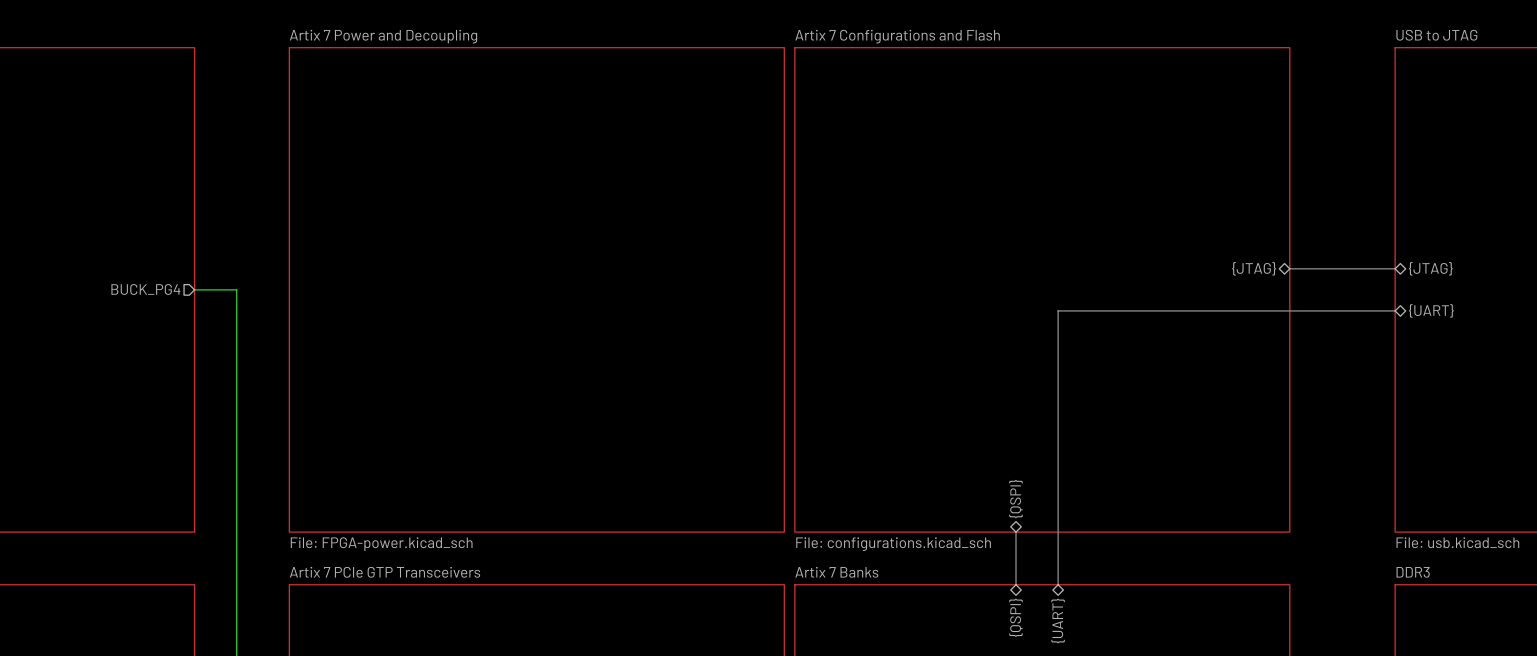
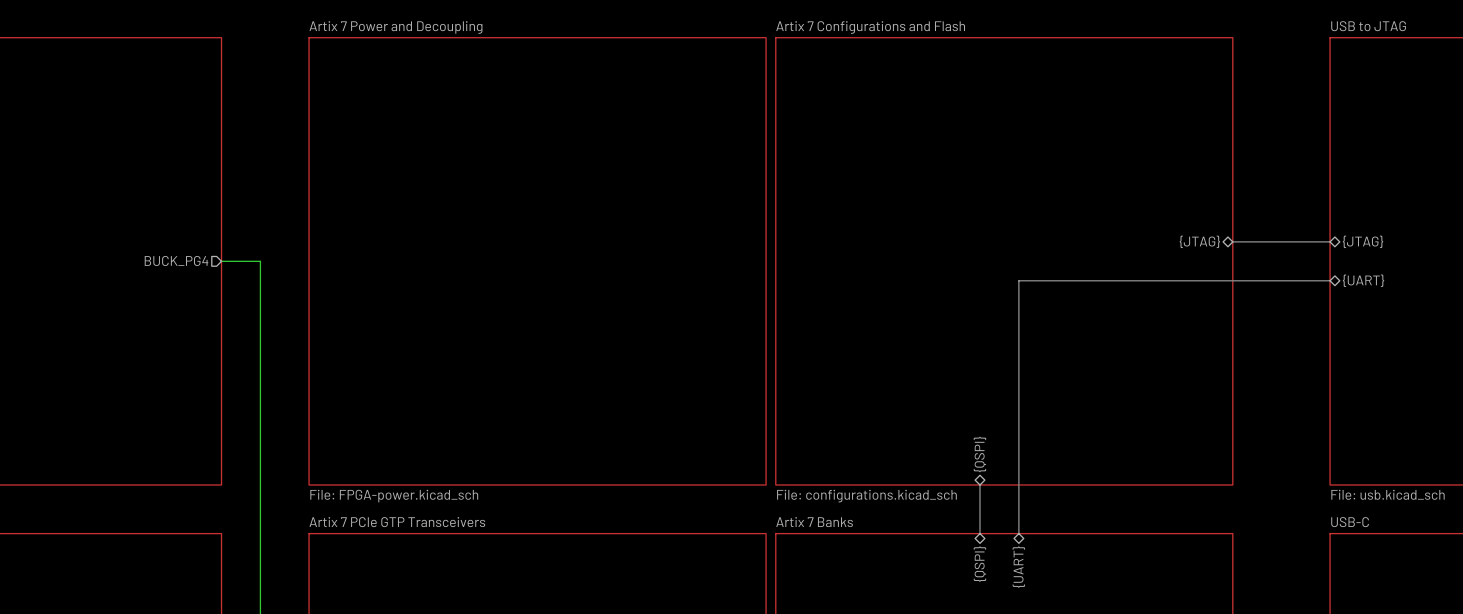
sheet DDR3 name: DDR3 (1413, 572) -> USB-C (1350, 522)

